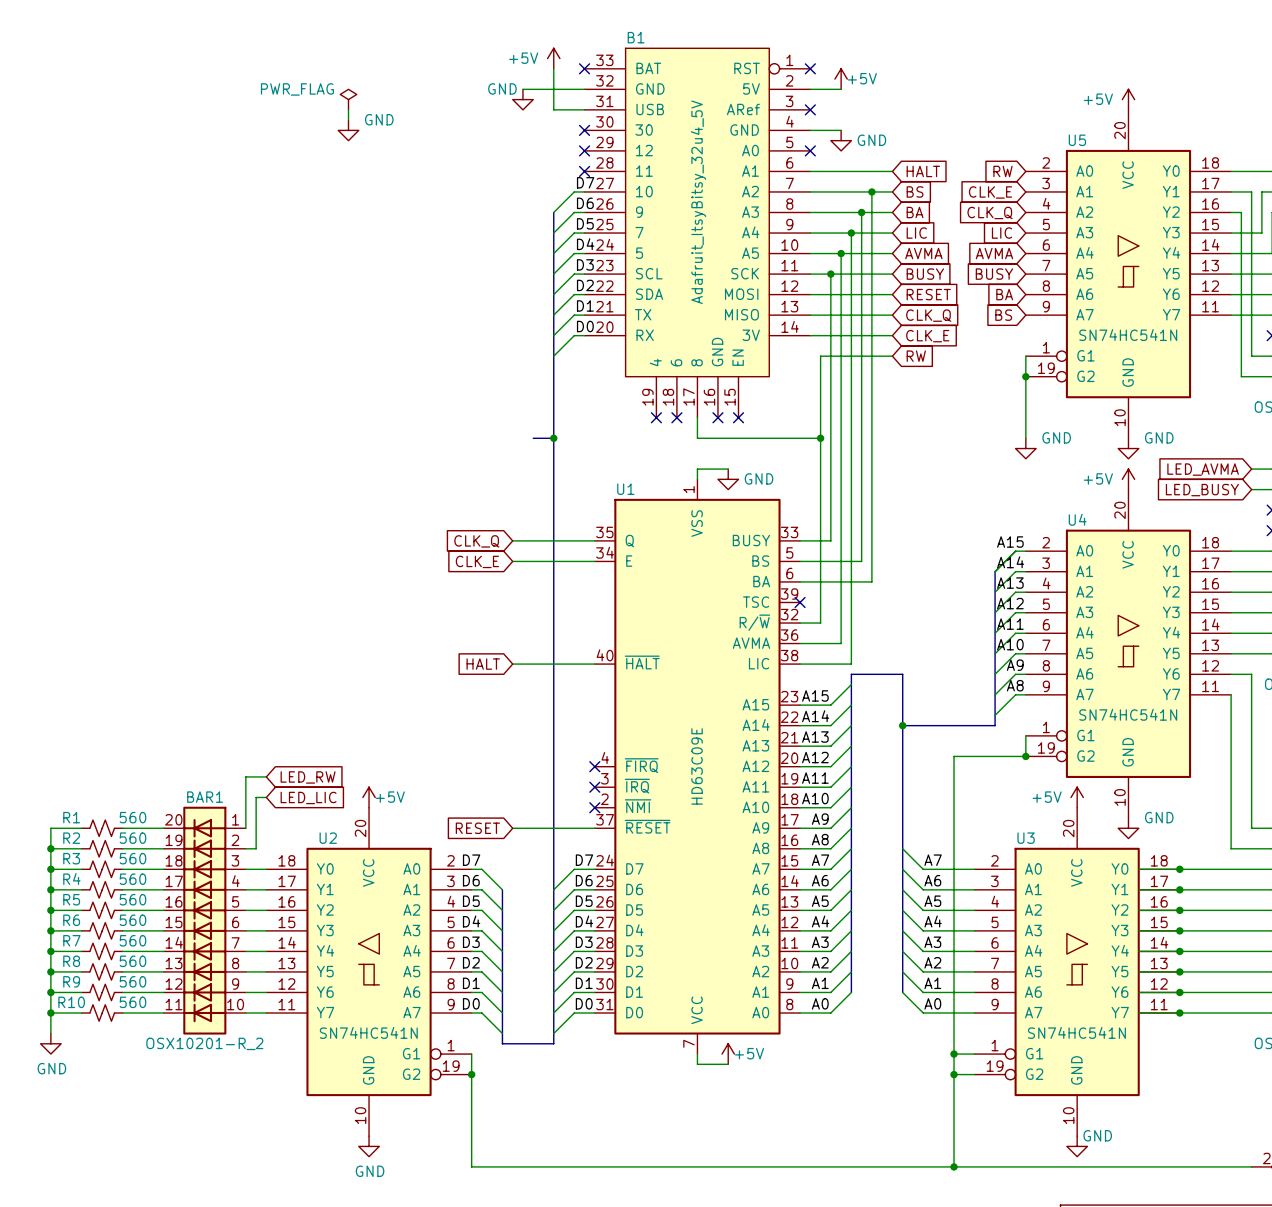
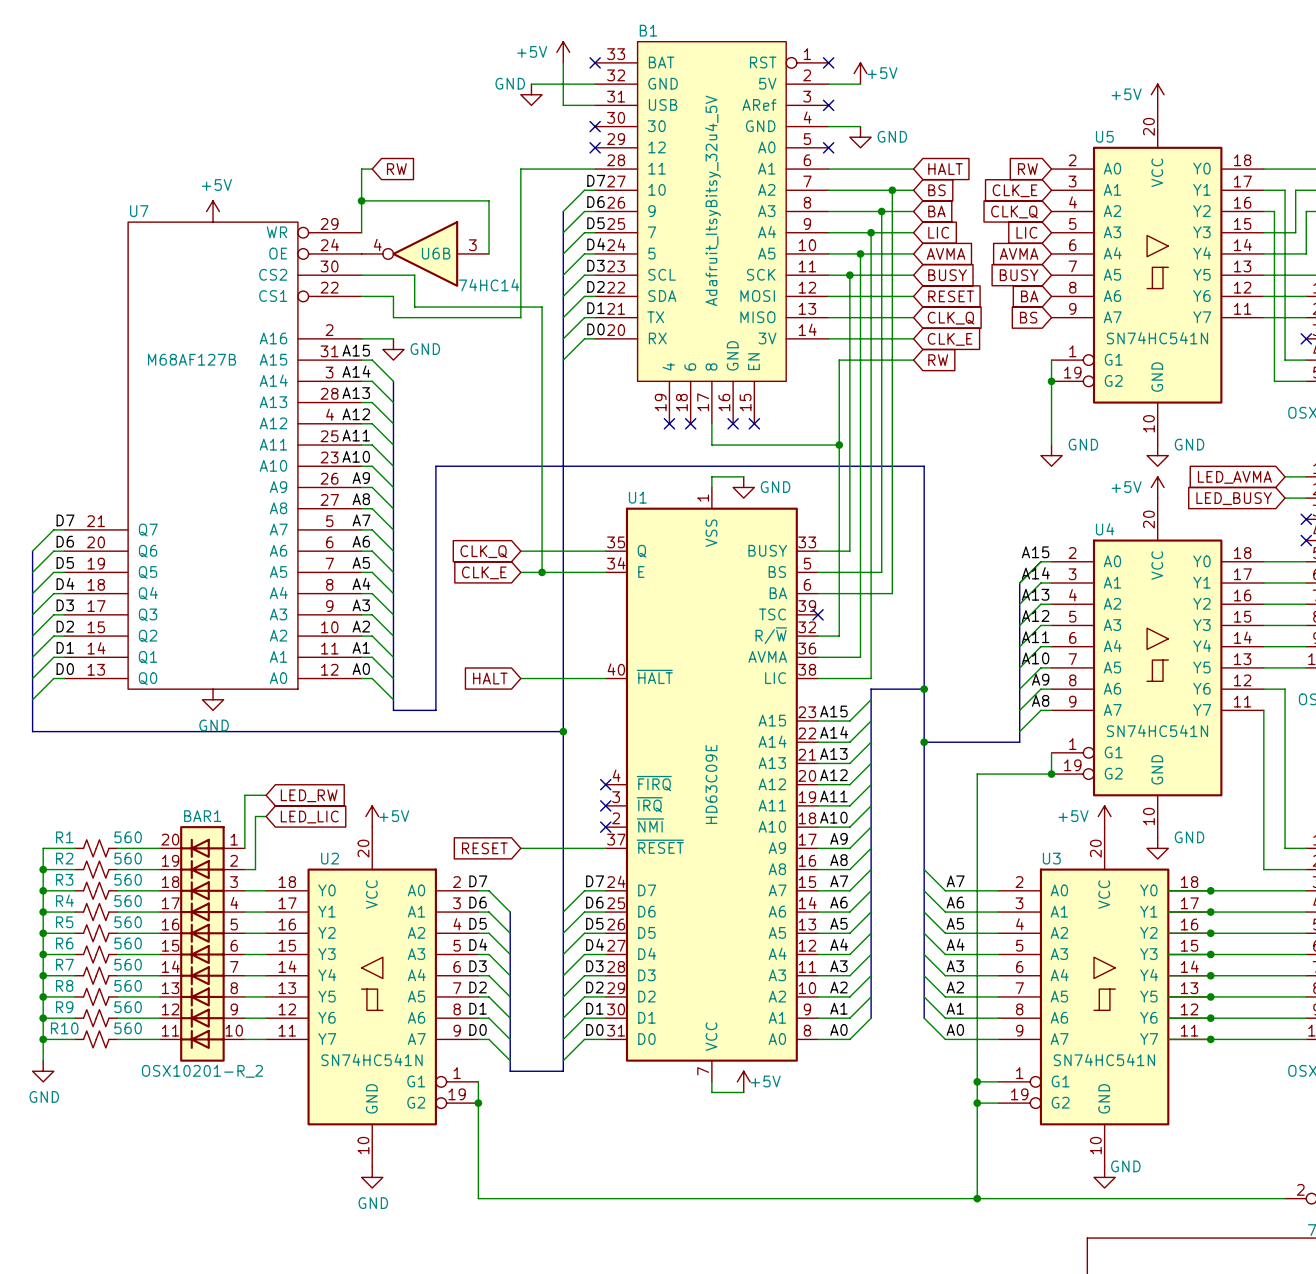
power symbol: PWR_FLAG (348, 99) -> none
wire: (348, 109) (348, 120) -> none
power symbol: GND (348, 130) -> none
wire: none -> (372, 169) (361, 169) (361, 232)
global label: none -> RW (396, 169)
wire: none -> (595, 169) (520, 169) (520, 317) (393, 317) (393, 296) (361, 296)
no-connect mark: (584, 171) -> none
wire: none -> (361, 200) (488, 200) (488, 253)
junction: none -> (361, 200)
power symbol: none -> +5V (213, 211)
U6B: none -> 74HC14 (425, 253)
wire: none -> (361, 275) (414, 275) (414, 307) (542, 307) (542, 572)
wire: none -> (361, 338) (393, 338)
power symbol: none -> GND (393, 349)
label: none -> A15 (356, 350)
wire: none -> (361, 360) (372, 360) (393, 381)
label: none -> A14 (356, 371)
wire: none -> (361, 381) (372, 381) (393, 402)
bus: none -> (393, 381) (393, 710) (435, 710) (435, 466) (924, 466) (924, 689)
label: none -> A13 (356, 393)
wire: none -> (361, 402) (372, 402) (393, 423)
label: none -> A12 (356, 414)
wire: none -> (361, 423) (372, 423) (393, 445)
label: none -> A11 (356, 435)
wire: none -> (361, 445) (372, 445) (393, 466)
bus: (533, 438) (553, 438) -> none
junction: (553, 438) -> none
U7: none -> M68AF127B (213, 455)
label: none -> A10 (356, 456)
wire: none -> (361, 466) (372, 466) (393, 487)
label: none -> A9 (361, 478)
wire: none -> (361, 487) (372, 487) (393, 508)
label: none -> A8 (361, 499)
wire: none -> (361, 508) (372, 508) (393, 529)
label: none -> D7 (65, 520)
label: none -> A7 (361, 520)
wire: none -> (64, 529) (53, 529) (32, 551)
wire: none -> (361, 529) (372, 529) (393, 551)
label: none -> D6 (65, 541)
label: none -> A6 (361, 541)
bus: none -> (32, 551) (32, 731) (563, 731)
wire: none -> (64, 551) (53, 551) (32, 572)
wire: none -> (361, 551) (372, 551) (393, 572)
label: none -> D5 (65, 562)
label: none -> A5 (361, 562)
wire: none -> (64, 572) (53, 572) (32, 593)
wire: none -> (361, 572) (372, 572) (393, 593)
junction: none -> (542, 572)
label: none -> D4 (65, 583)
label: none -> A4 (361, 583)
wire: none -> (64, 593) (53, 593) (32, 614)
wire: none -> (361, 593) (372, 593) (393, 614)
label: none -> D3 (65, 605)
label: none -> A3 (361, 605)
wire: none -> (64, 614) (53, 614) (32, 636)
wire: none -> (361, 614) (372, 614) (393, 636)
label: none -> D2 (65, 626)
label: none -> A2 (361, 626)
wire: none -> (64, 636) (53, 636) (32, 657)
wire: none -> (361, 636) (372, 636) (393, 657)
label: none -> D1 (65, 647)
label: none -> A1 (361, 647)
wire: none -> (64, 657) (53, 657) (32, 678)
wire: none -> (361, 657) (372, 657) (393, 678)
label: none -> D0 (65, 669)
label: none -> A0 (361, 669)
wire: none -> (64, 678) (53, 678) (32, 699)
wire: none -> (361, 678) (372, 678) (393, 699)
junction: none -> (924, 689)
power symbol: none -> GND (213, 699)
junction: none -> (563, 731)

